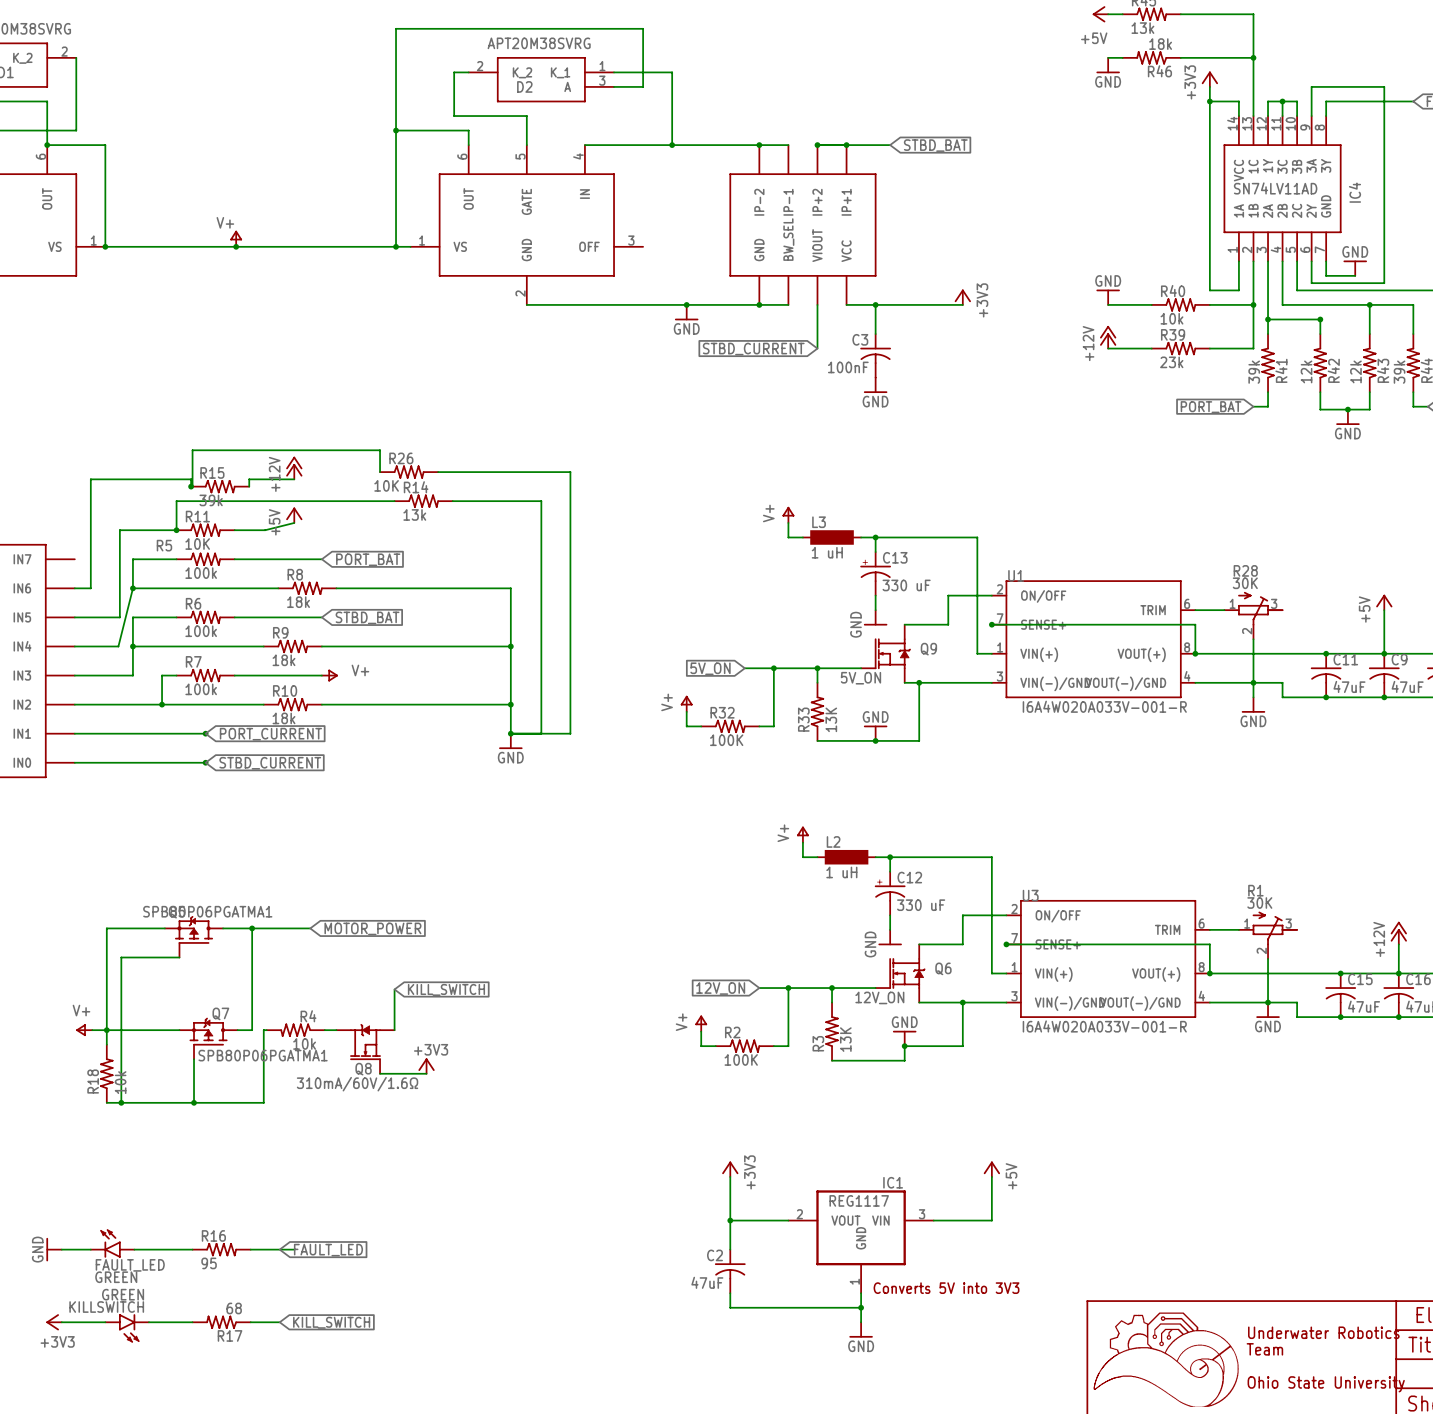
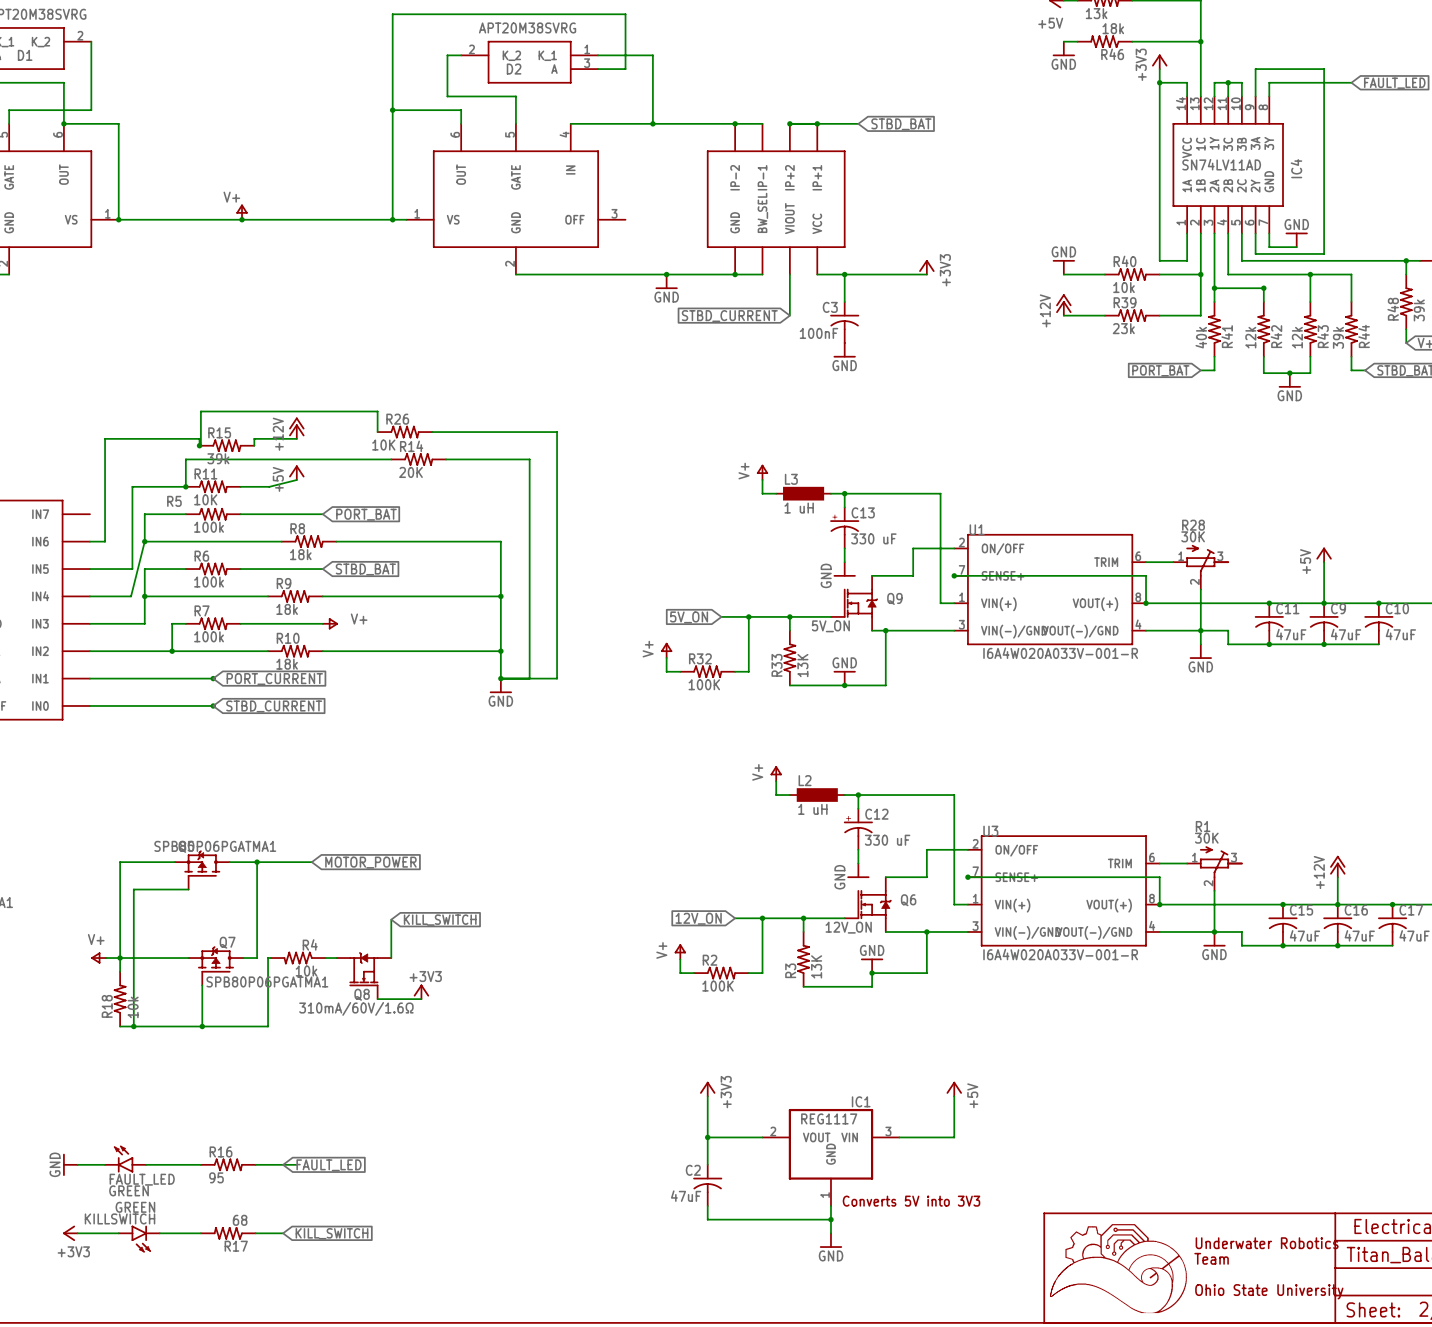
R41 value: 39k (1254, 372) -> 40k (1201, 337)
R14 value: 13k (414, 514) -> 20K (410, 472)

